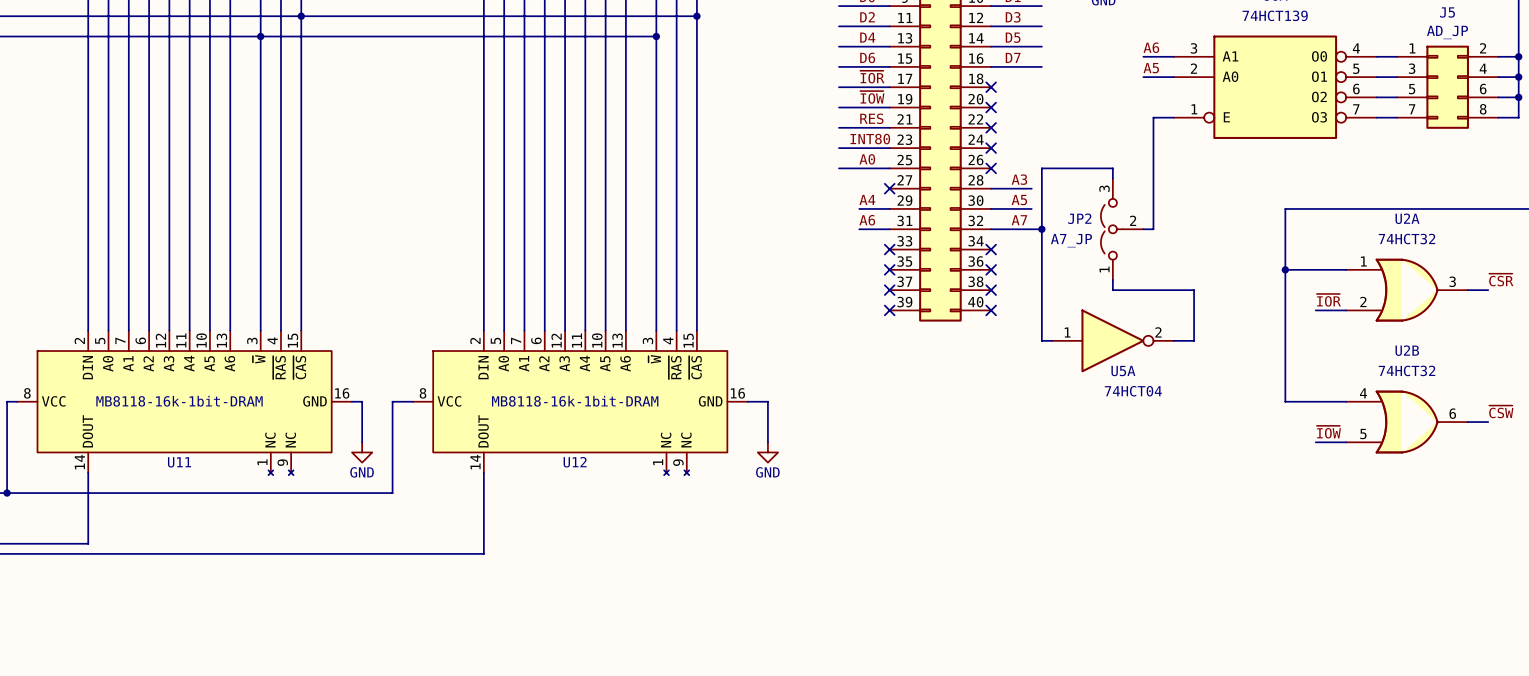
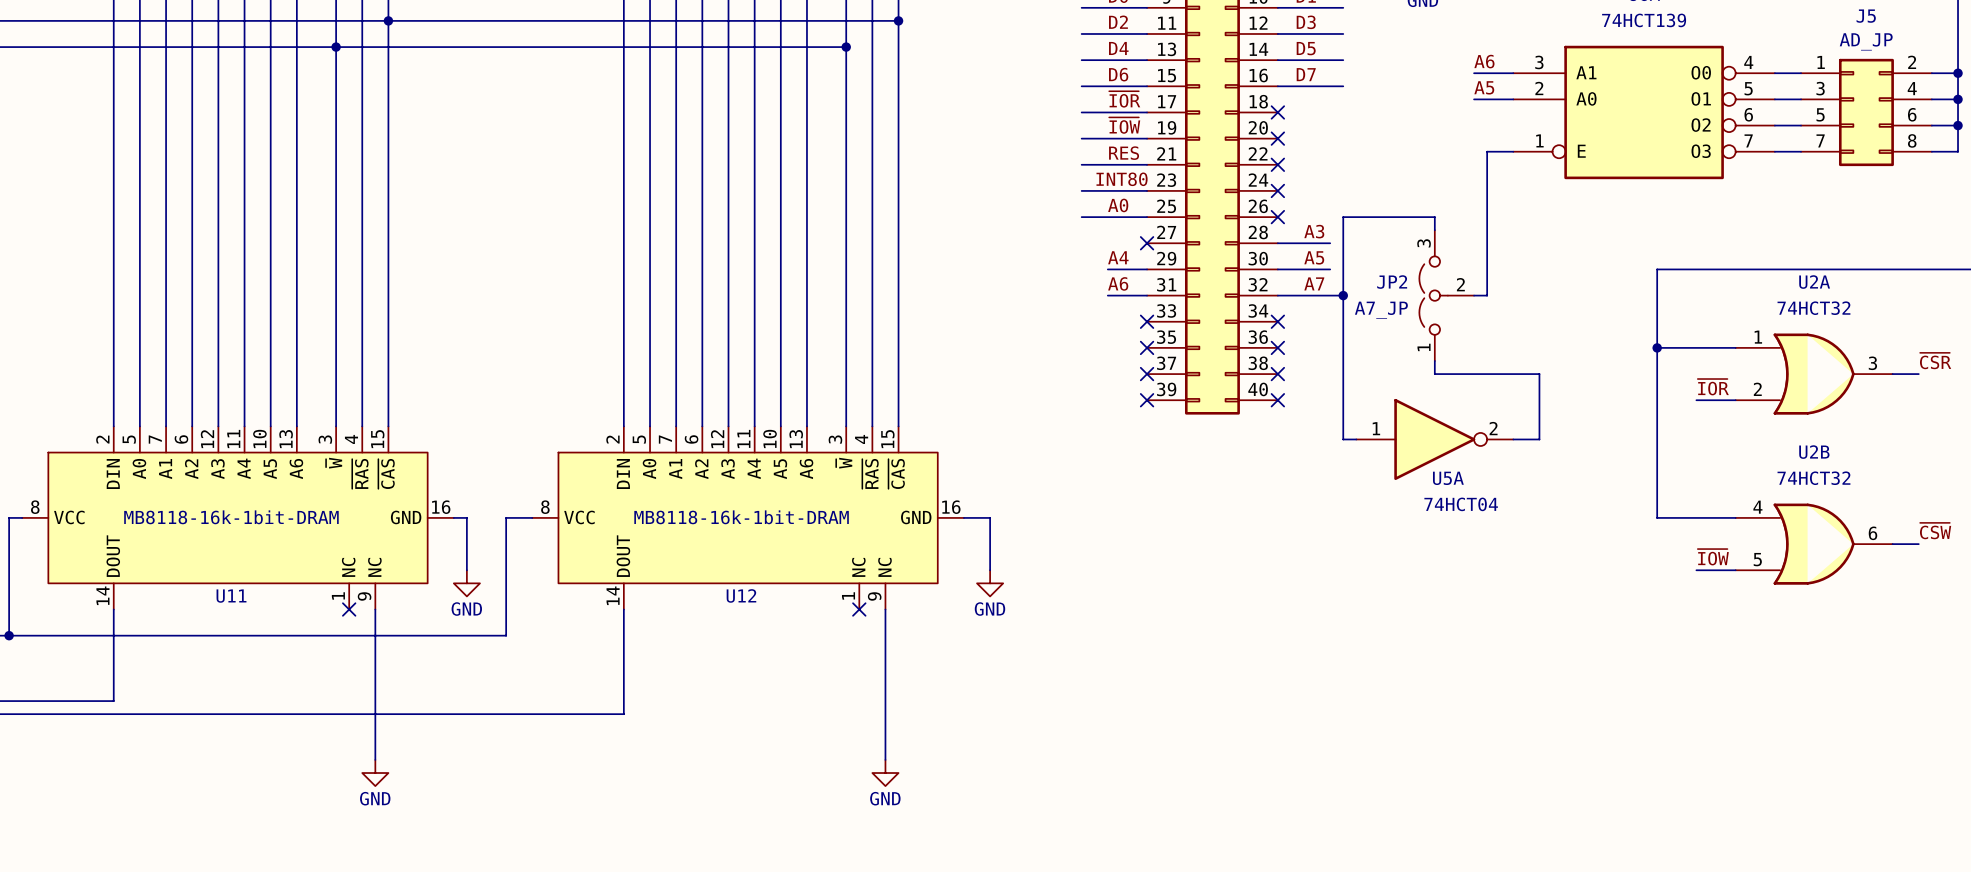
U11 symbol: [17, 330, 353, 476] -> [22, 426, 454, 610]
U12 symbol: [412, 330, 748, 476] -> [532, 426, 964, 610]
no-connect mark: none -> (349, 609)
wire: none -> (375, 609) (375, 759)
no-connect mark: none -> (859, 609)
wire: none -> (885, 609) (885, 759)
power symbol: none -> GND (375, 773)
power symbol: none -> GND (885, 773)

